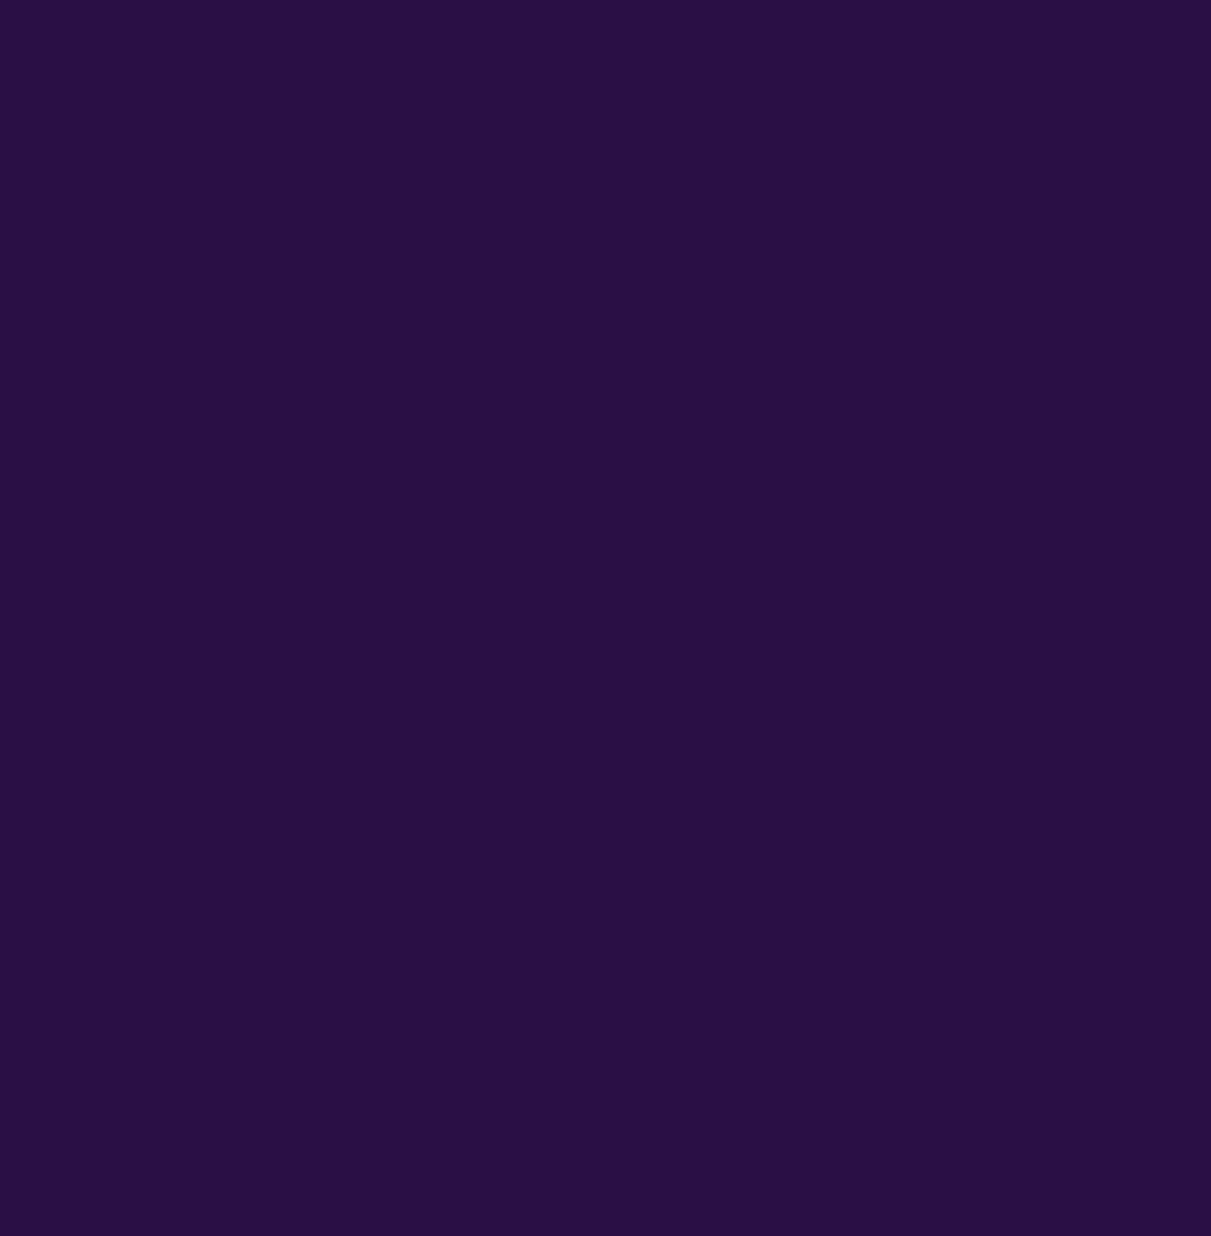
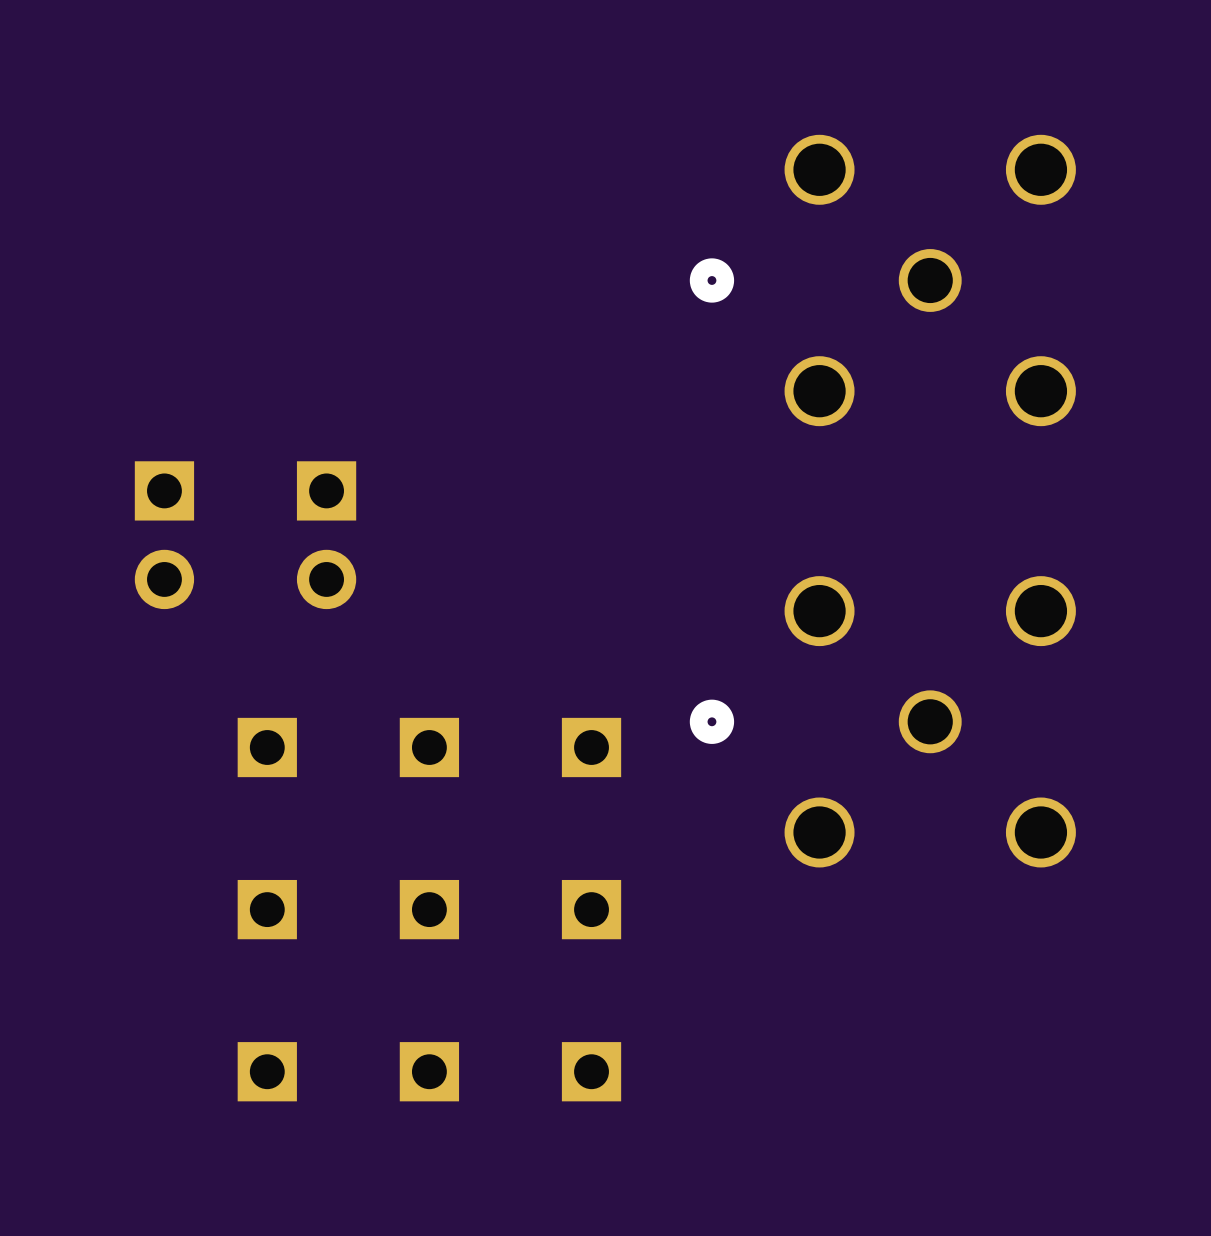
part: none -> (882, 280)
part: none -> (164, 535)
part: none -> (326, 535)
part: none -> (882, 721)
part: none -> (267, 747)
part: none -> (429, 747)
part: none -> (591, 747)
part: none -> (267, 909)
part: none -> (429, 909)
part: none -> (591, 909)
part: none -> (267, 1071)
part: none -> (429, 1071)
part: none -> (591, 1071)

